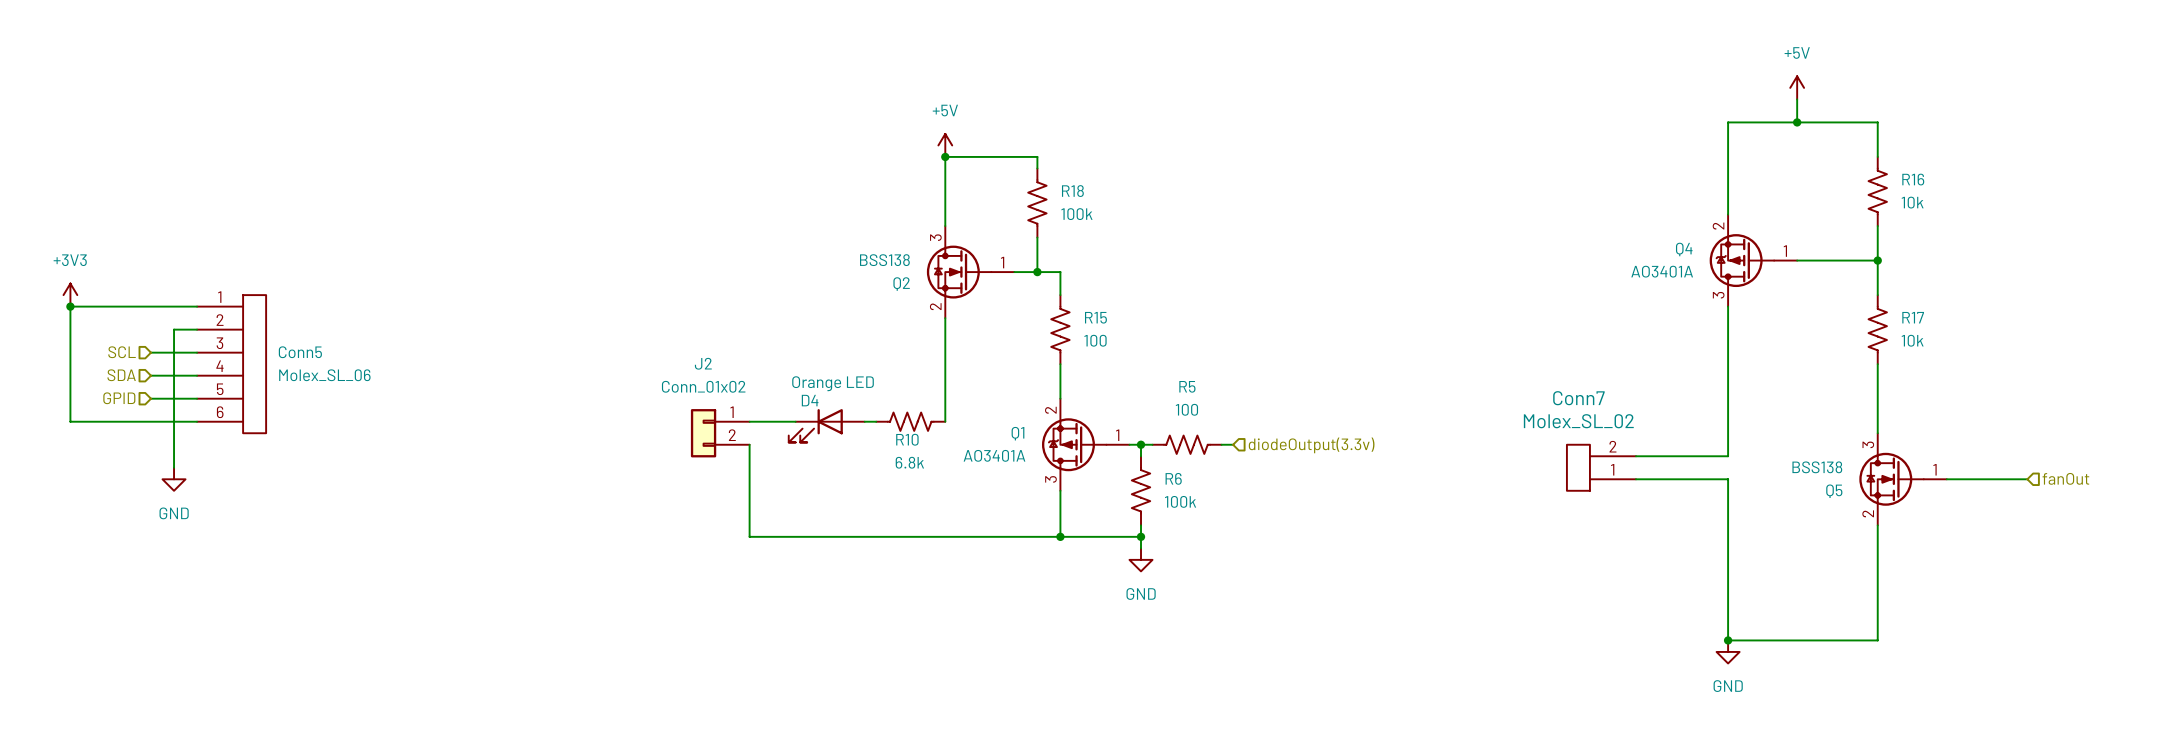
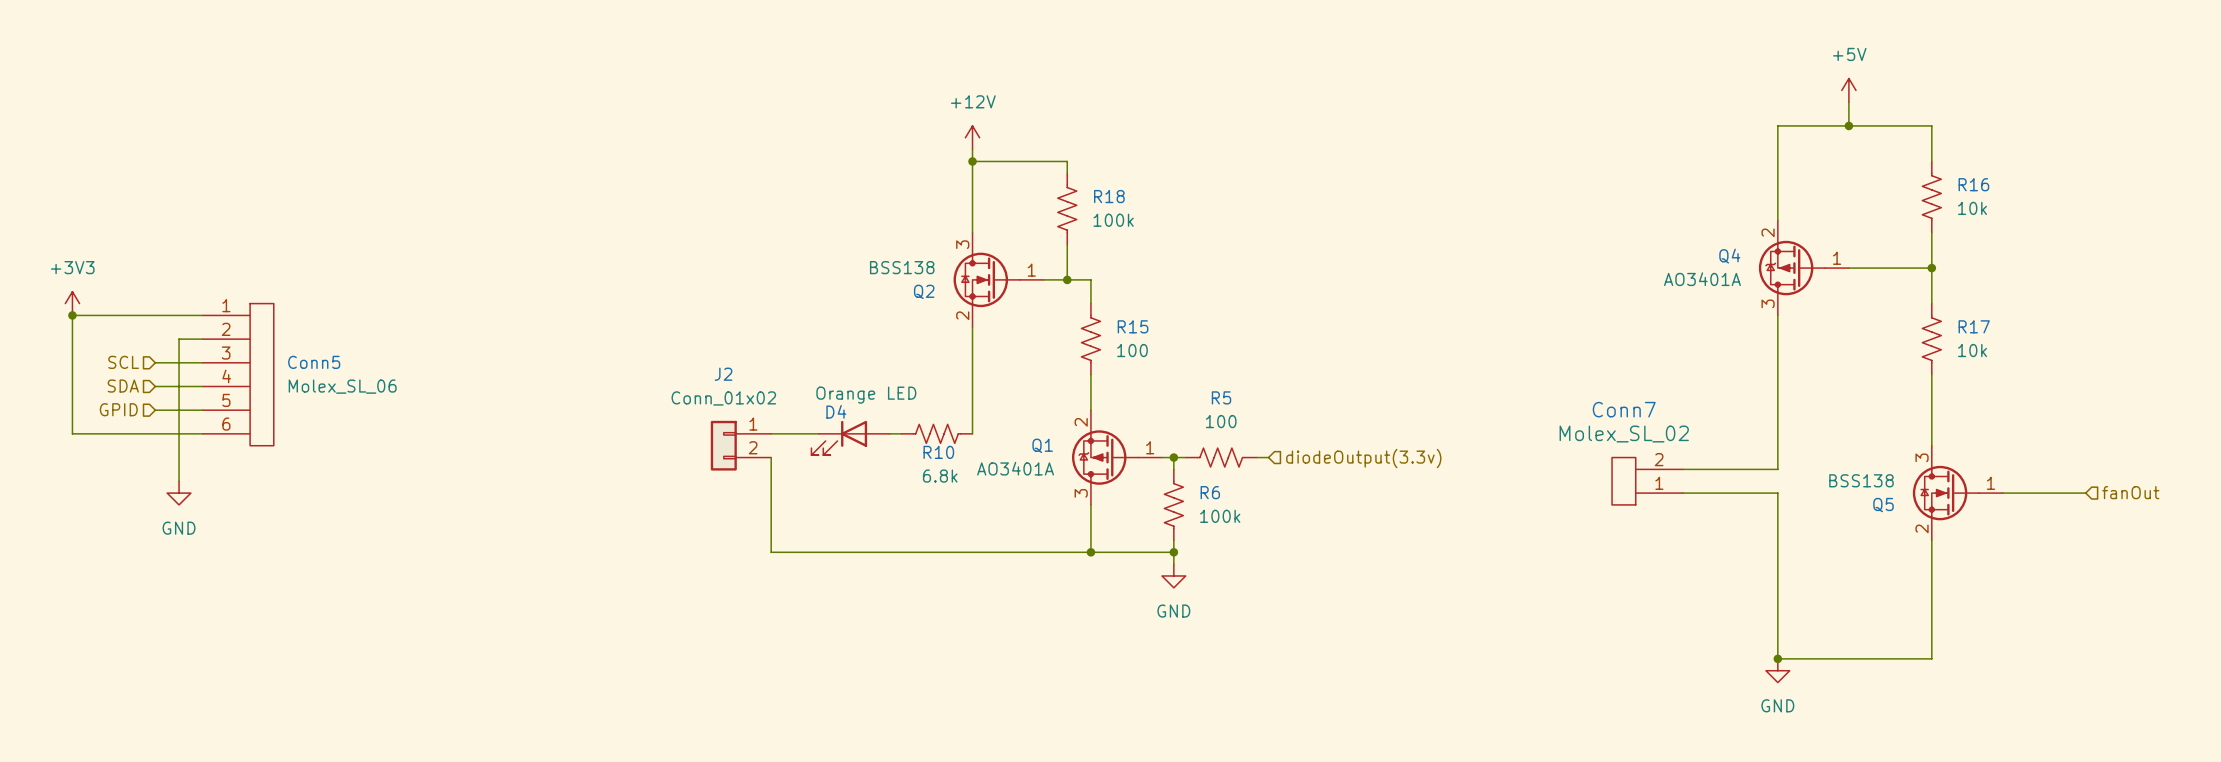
power symbol: none -> +12V (972, 137)
power symbol: +5V (945, 145) -> none

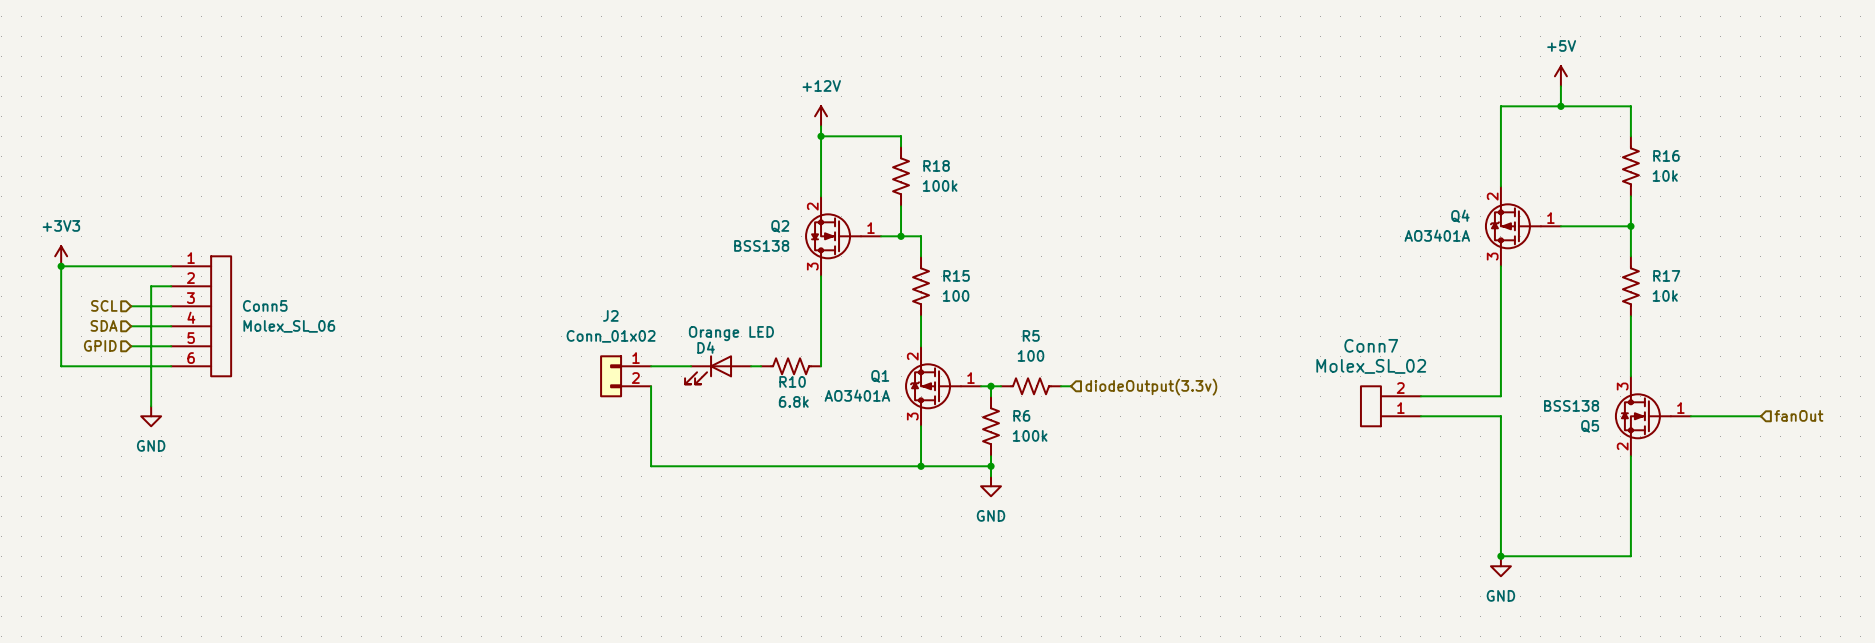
Q2 flip: as is (986, 279) -> up-down (833, 236)

